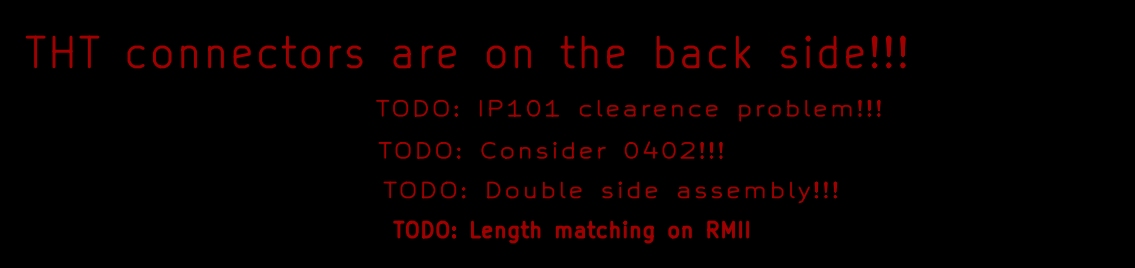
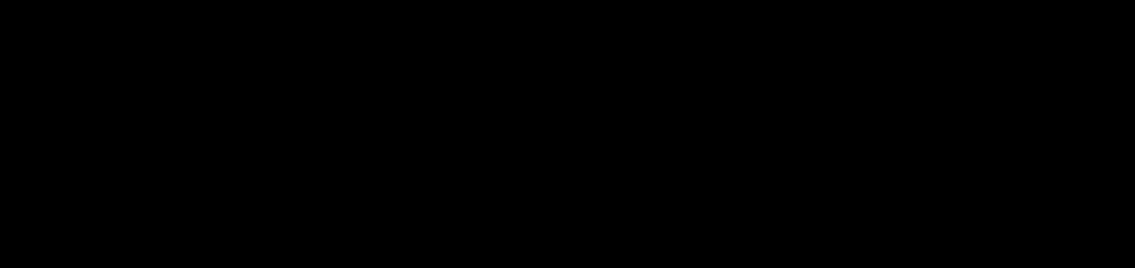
text: THT connectors are on the back side!!! (465, 51) -> none
text: TODO: IP101 clearence problem!!! (628, 110) -> none
text: TODO: Consider 0402!!! (550, 150) -> none
text: TODO: Double side assembly!!! (610, 192) -> none
text: TODO: Length matching on RMII (571, 232) -> none

